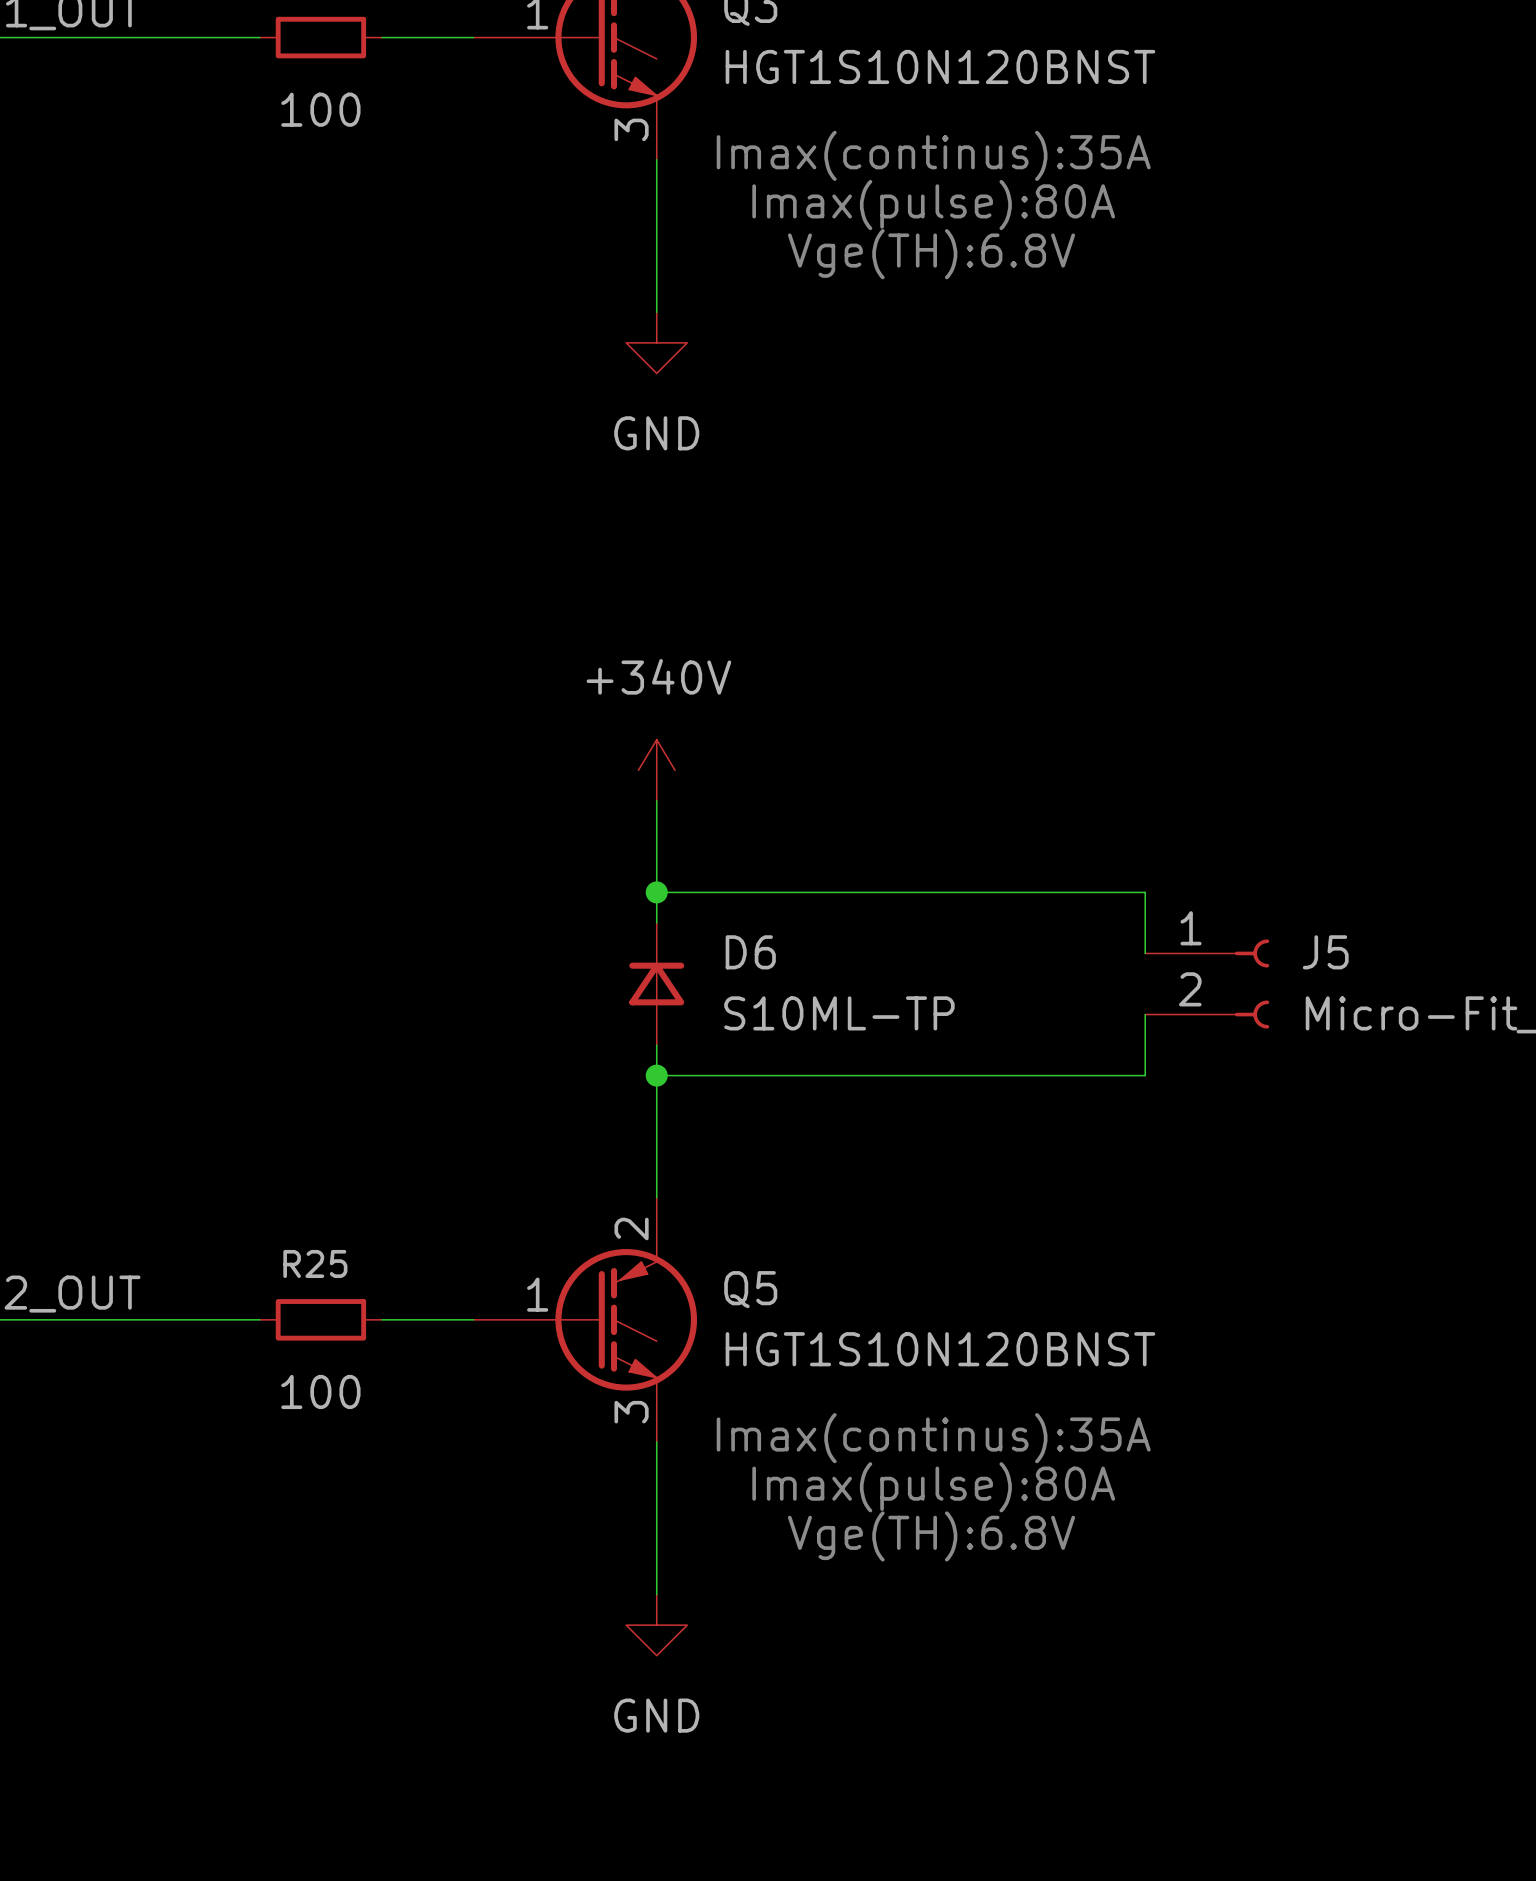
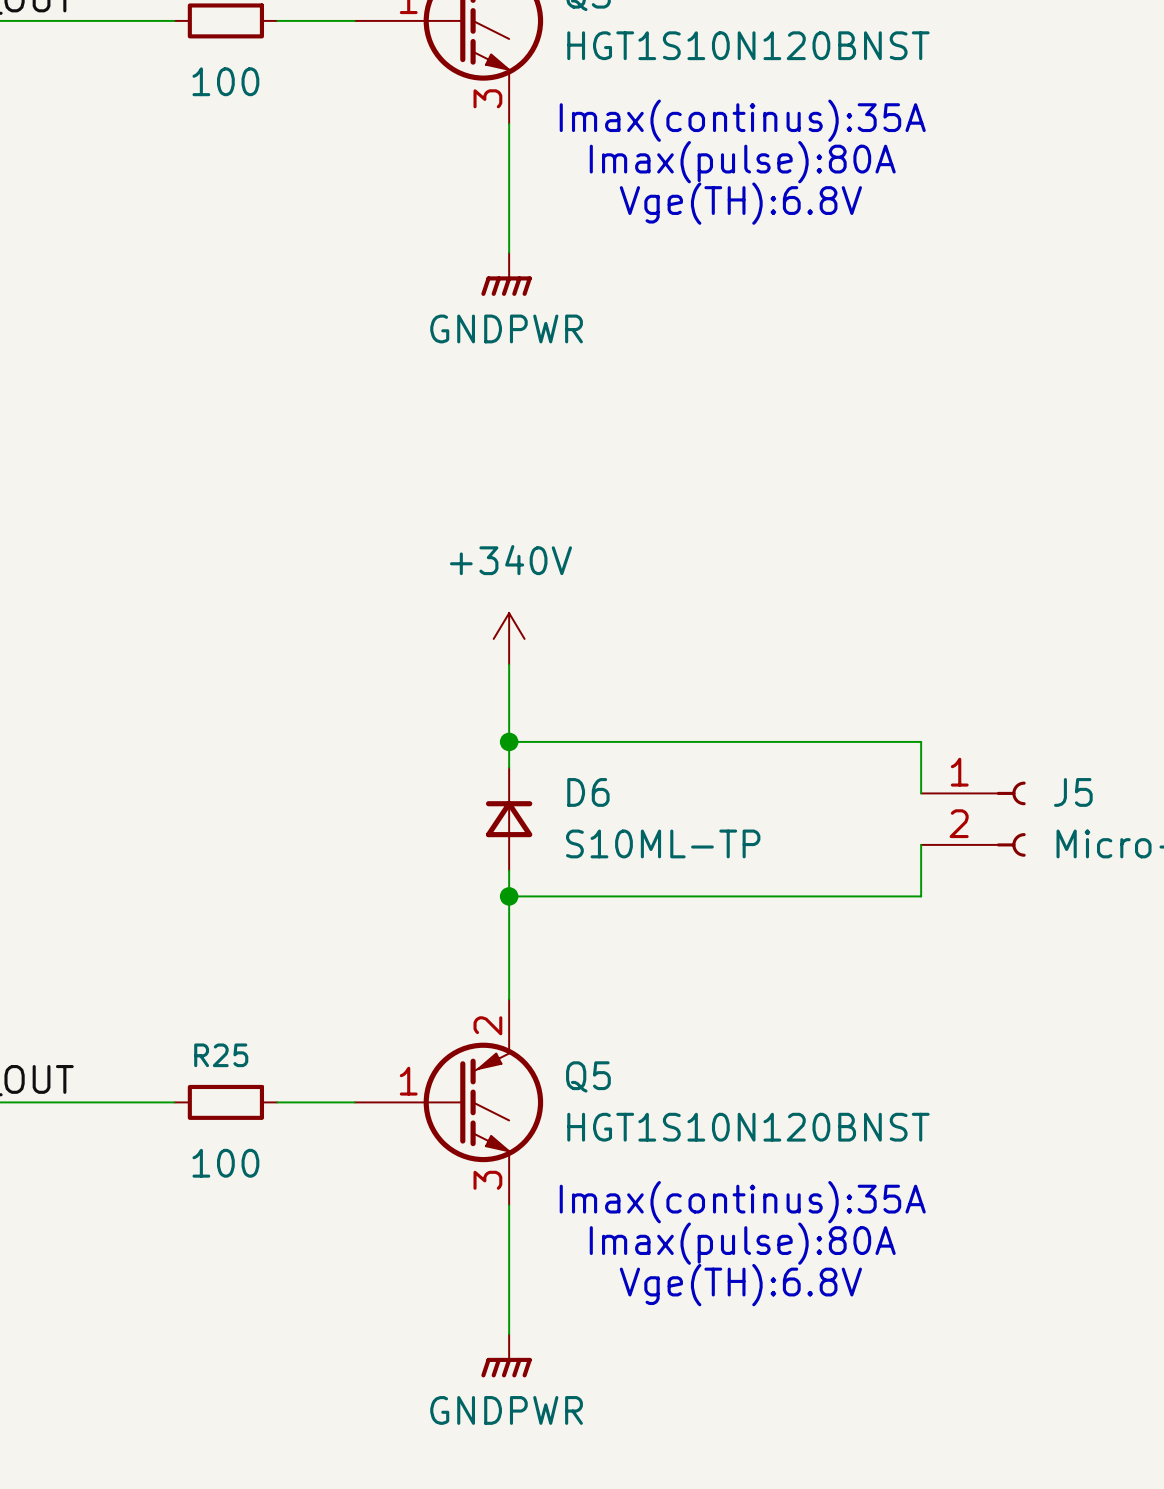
power symbol: GND (656, 342) -> GNDPWR (506, 274)
power symbol: GND (656, 1625) -> GNDPWR (506, 1355)

